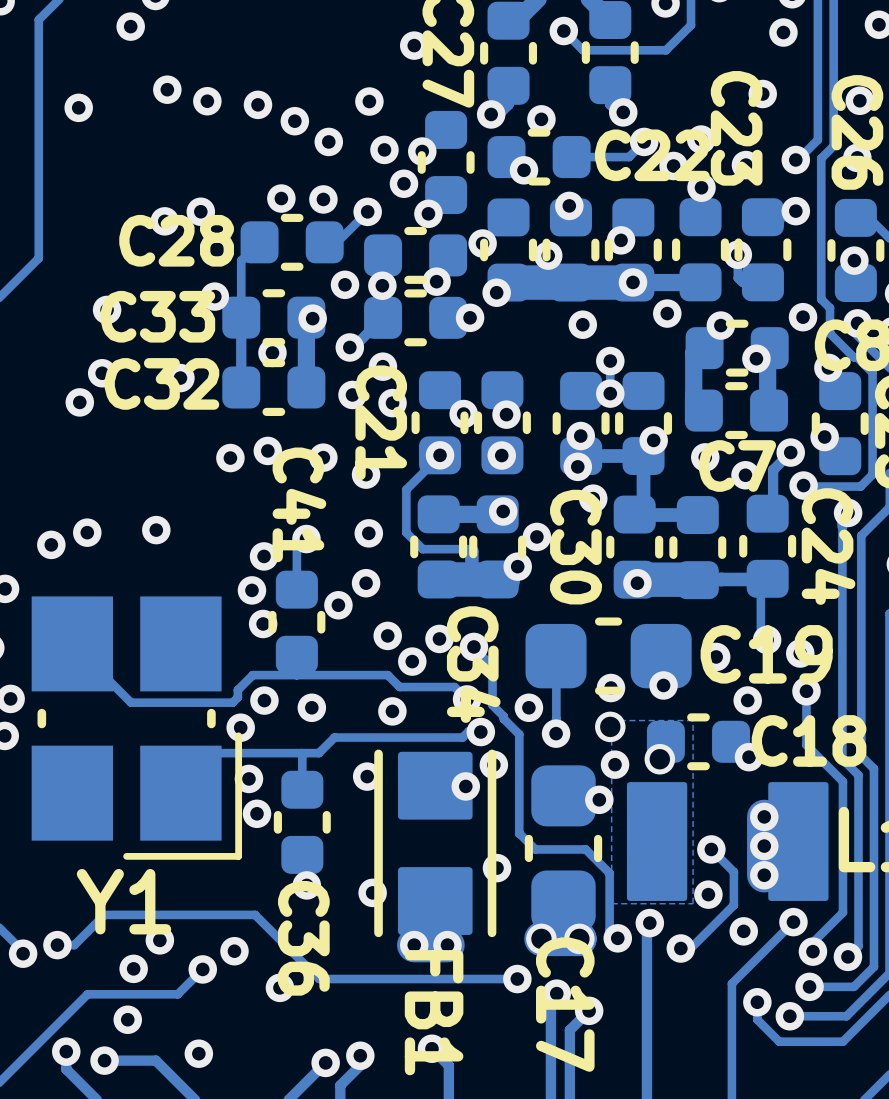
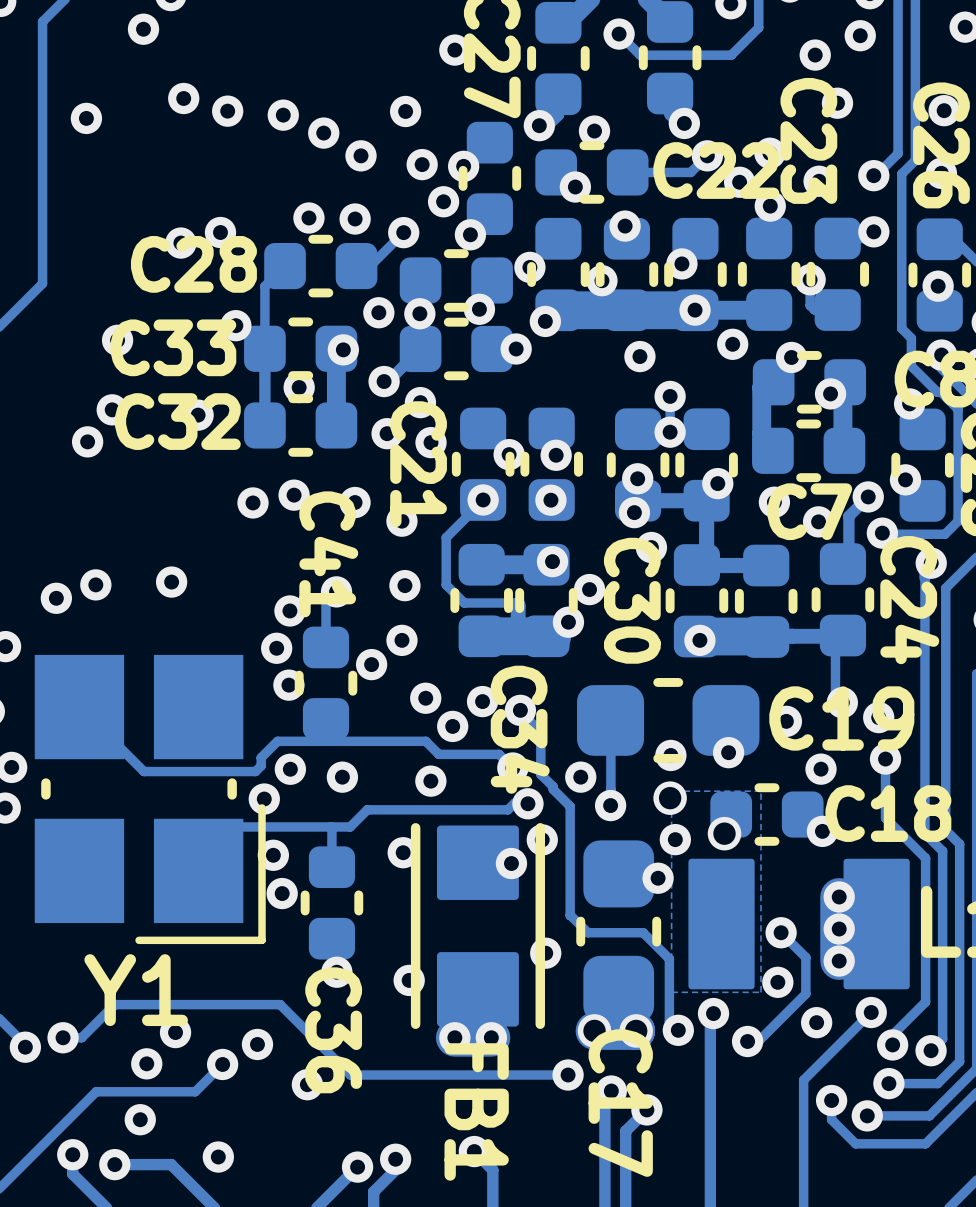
via: none -> (815, 55)
via: (803, 317) -> none

